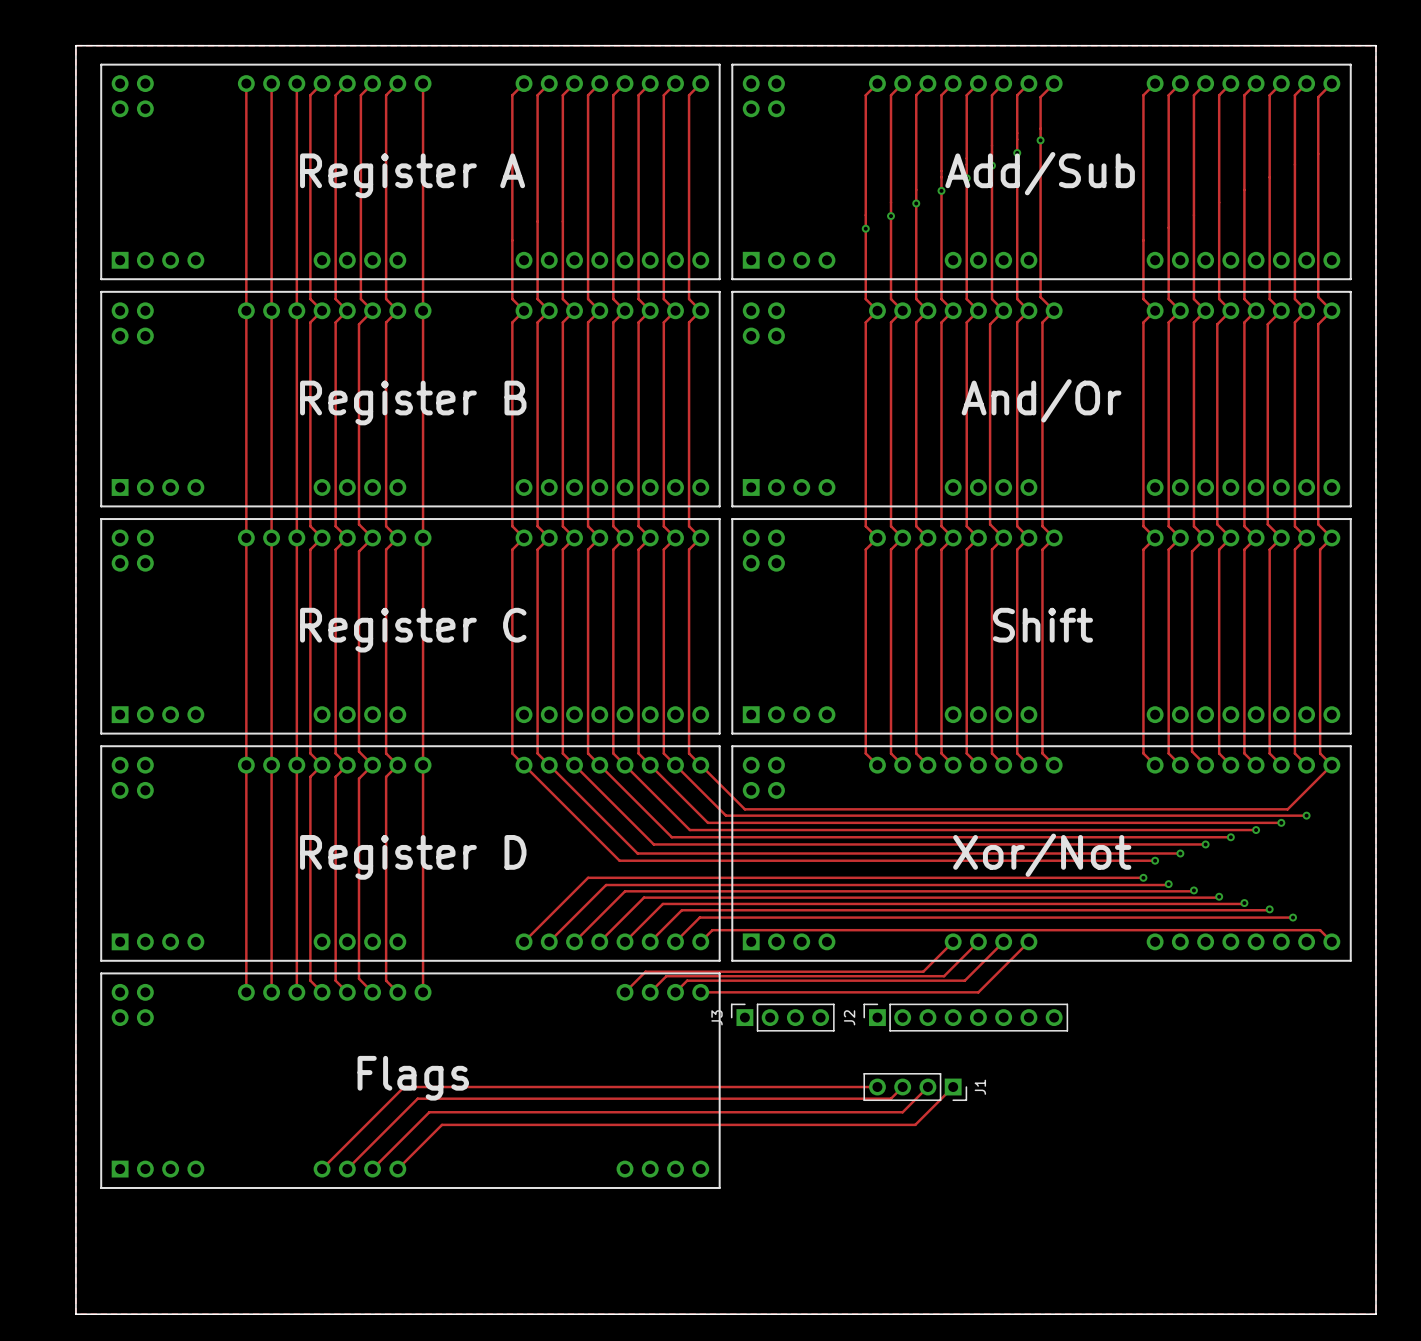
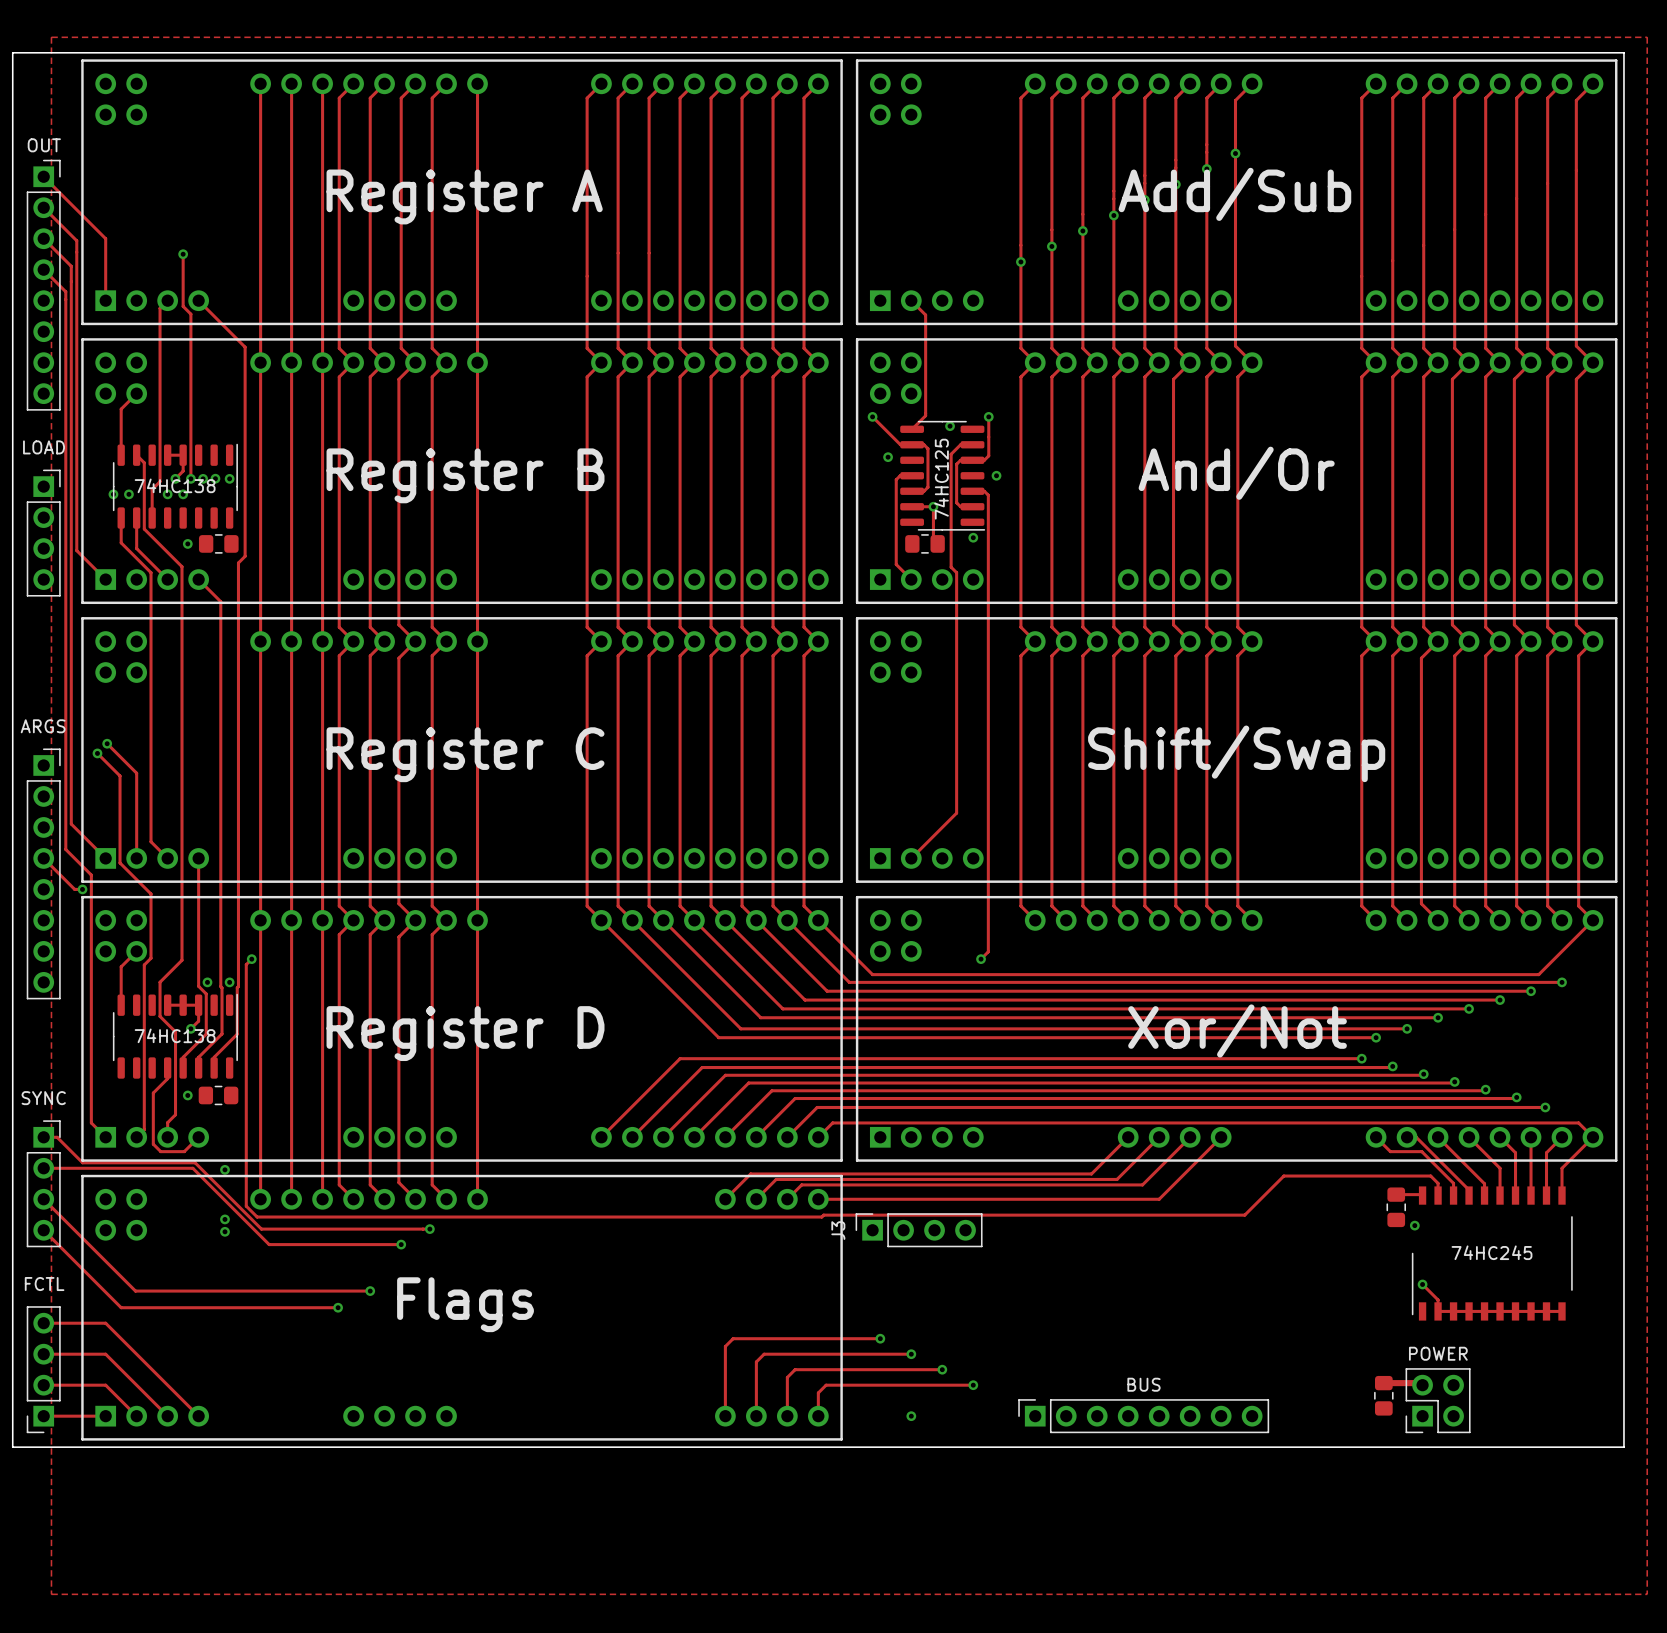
board edge: (75, 45) (75, 1314) (1376, 1314) (1376, 45) (75, 45) -> (12, 52) (12, 1447) (1623, 1447) (1623, 52) (12, 52)
track: none -> (43, 176) (105, 238) (105, 300)
track: none -> (43, 207) (76, 240) (76, 550) (105, 579)
track: none -> (43, 238) (71, 266) (71, 824) (105, 858)
track: none -> (183, 254) (183, 306) (190, 314) (190, 478)
via: none -> (183, 254)
track: none -> (43, 269) (65, 291) (65, 849) (91, 875) (91, 1122) (105, 1137)
part: none -> OUT (43, 285)
track: none -> (167, 300) (160, 308) (160, 481) (152, 489) (152, 518)
track: none -> (198, 300) (245, 347) (245, 556) (238, 562) (237, 1034) (214, 1057) (214, 1068)
track: none -> (911, 300) (925, 315) (925, 415) (912, 429)
track: none -> (136, 393) (121, 409) (121, 455)
track: none -> (872, 416) (900, 444) (924, 444) (927, 448) (927, 487) (924, 491) (912, 491)
via: none -> (872, 416)
track: none -> (988, 416) (988, 455) (984, 460) (960, 460) (956, 464) (956, 502) (960, 506) (972, 506)
via: none -> (988, 416)
via: none -> (950, 426)
track: none -> (972, 444) (960, 444) (951, 454) (951, 567) (956, 572) (956, 813) (911, 858)
track: none -> (136, 455) (144, 462) (144, 529) (181, 566) (181, 960) (160, 982) (160, 1016) (175, 1031) (175, 1114) (167, 1122) (167, 1137)
track: none -> (167, 455) (183, 455) (183, 471) (175, 478)
via: none -> (888, 457)
track: none -> (912, 475) (900, 475) (896, 479) (896, 564) (911, 579)
part: none -> 74HC125 (942, 475)
via: none -> (996, 475)
via: none -> (175, 478)
via: none -> (190, 478)
via: none -> (203, 478)
via: none -> (215, 478)
via: none -> (229, 478)
part: none -> 74HC138 (175, 486)
track: none -> (972, 491) (984, 491) (988, 495) (988, 951) (981, 959)
via: none -> (113, 494)
via: none -> (128, 494)
via: none -> (167, 494)
via: none -> (183, 494)
track: none -> (912, 506) (933, 506) (933, 539) (937, 543)
via: none -> (933, 506)
track: none -> (121, 518) (121, 542) (151, 572) (151, 841) (167, 858)
track: none -> (136, 518) (136, 548) (167, 579)
part: none -> LOAD (43, 533)
via: none -> (973, 537)
via: none -> (187, 543)
part: none -> (218, 543)
part: none -> (924, 543)
track: none -> (198, 579) (220, 601) (222, 987) (222, 1033) (198, 1057) (198, 1068)
track: none -> (107, 743) (136, 773) (136, 858)
via: none -> (107, 743)
part value: Shift (1042, 625) -> Shift/Swap (1236, 753)
track: none -> (97, 753) (120, 775) (120, 862) (151, 893) (151, 958) (144, 964) (144, 1129) (136, 1137)
via: none -> (97, 753)
track: none -> (43, 858) (74, 889) (82, 889)
track: none -> (198, 858) (198, 986) (206, 993) (206, 1034) (183, 1057) (183, 1068)
part: none -> ARGS (43, 873)
via: none -> (82, 889)
track: none -> (136, 951) (121, 966) (121, 1005)
track: none -> (251, 959) (246, 964) (246, 1206) (257, 1217) (1244, 1215) (1283, 1176) (1430, 1176) (1438, 1183) (1438, 1195)
via: none -> (251, 959)
via: none -> (981, 959)
via: none -> (207, 982)
via: none -> (229, 982)
track: none -> (167, 1005) (198, 1005) (198, 1021) (190, 1028)
via: none -> (190, 1028)
part: none -> 74HC138 (175, 1036)
track: none -> (167, 1068) (167, 1078) (153, 1093) (153, 1144) (160, 1151) (184, 1151) (198, 1137)
via: none -> (187, 1095)
part: none -> (218, 1095)
track: none -> (43, 1137) (57, 1137) (82, 1162) (195, 1162) (261, 1229) (429, 1229)
track: none -> (1376, 1137) (1390, 1151) (1421, 1151) (1453, 1183) (1453, 1195)
track: none -> (1407, 1137) (1416, 1137) (1469, 1190) (1469, 1195)
track: none -> (1438, 1137) (1484, 1183) (1484, 1195)
track: none -> (1469, 1137) (1500, 1168) (1500, 1195)
track: none -> (1500, 1137) (1515, 1152) (1515, 1195)
track: none -> (1531, 1137) (1531, 1195)
track: none -> (1562, 1137) (1546, 1152) (1546, 1195)
track: none -> (1592, 1137) (1562, 1168) (1562, 1195)
track: none -> (43, 1168) (192, 1168) (269, 1244) (401, 1244)
via: none -> (224, 1169)
part: none -> SYNC (43, 1183)
track: none -> (1396, 1194) (1422, 1195)
track: none -> (43, 1199) (135, 1291) (370, 1291)
part: none -> (1396, 1207)
via: none -> (224, 1219)
via: none -> (1414, 1225)
via: none -> (429, 1229)
track: none -> (43, 1230) (121, 1307) (338, 1307)
J2: (965, 1017) -> none
via: none -> (224, 1231)
via: none -> (401, 1244)
part: none -> 74HC245 (1492, 1253)
track: none -> (1422, 1284) (1438, 1299) (1438, 1311) (1562, 1311)
via: none -> (1422, 1284)
via: none -> (370, 1291)
via: none -> (338, 1307)
track: (877, 1087) (404, 1087) (322, 1169) -> none
track: (902, 1087) (891, 1098) (417, 1098) (347, 1169) -> none
J1: (915, 1087) -> none
track: (927, 1087) (902, 1112) (429, 1112) (372, 1169) -> none
track: (953, 1087) (915, 1124) (441, 1124) (397, 1169) -> none
track: none -> (43, 1323) (105, 1323) (198, 1416)
track: none -> (880, 1338) (733, 1338) (725, 1346) (725, 1416)
via: none -> (880, 1338)
track: none -> (43, 1354) (105, 1354) (167, 1416)
track: none -> (911, 1354) (764, 1354) (756, 1361) (756, 1416)
via: none -> (911, 1354)
part: none -> FCTL (43, 1369)
track: none -> (942, 1369) (795, 1369) (787, 1377) (787, 1416)
via: none -> (942, 1369)
track: none -> (1383, 1383) (1420, 1383) (1422, 1385)
track: none -> (43, 1385) (105, 1385) (136, 1416)
track: none -> (973, 1385) (826, 1385) (818, 1392) (818, 1416)
via: none -> (973, 1385)
part: none -> (1383, 1395)
part: none -> POWER (1438, 1400)
track: none -> (43, 1416) (105, 1416)
via: none -> (911, 1416)
part: none -> BUS (1143, 1416)

